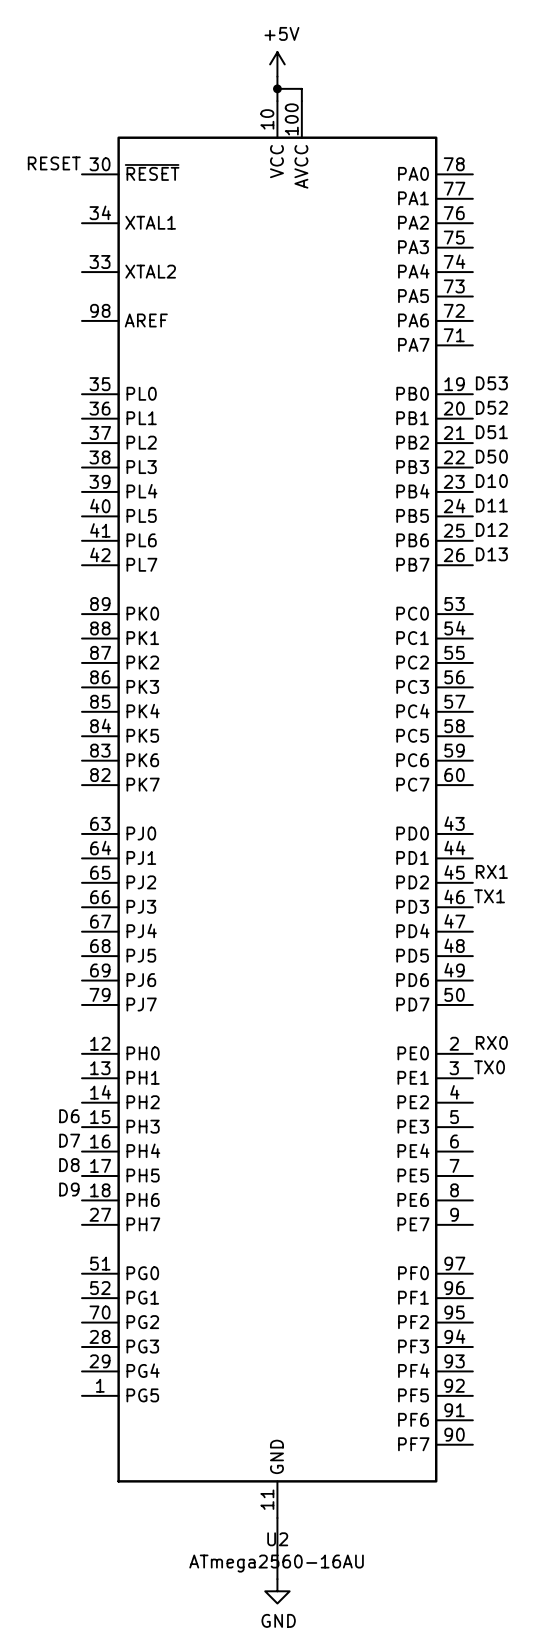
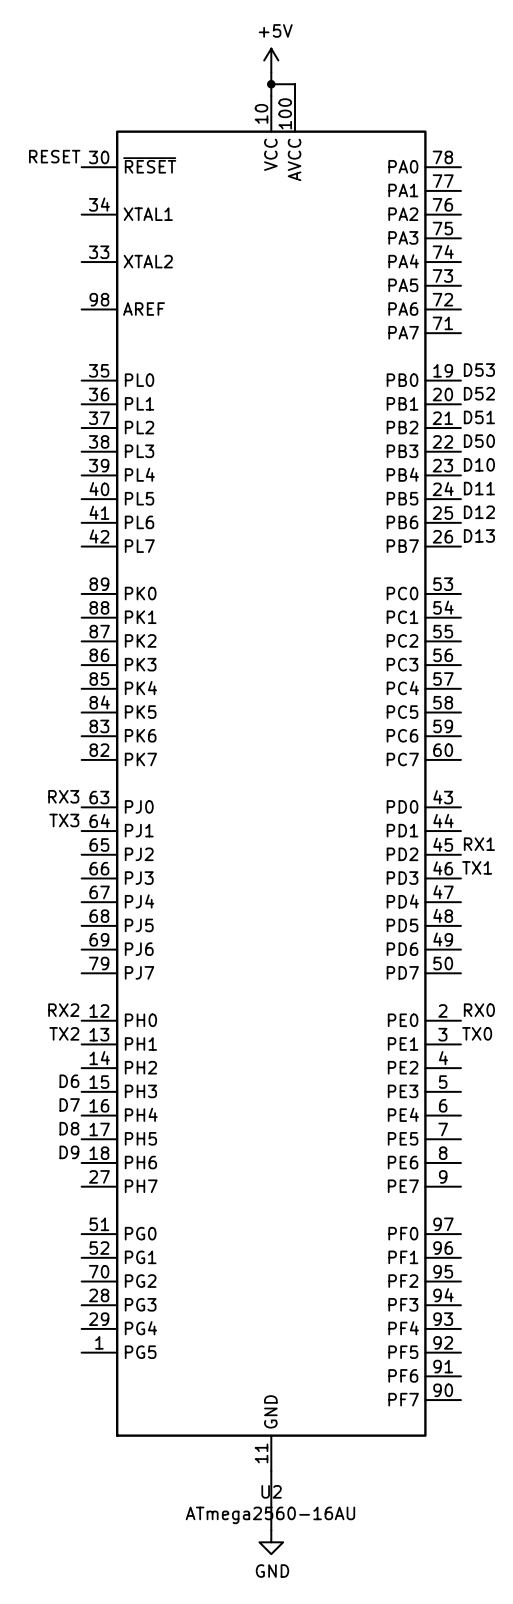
label: none -> RX3 (63, 796)
label: none -> TX3 (64, 820)
label: none -> RX2 (63, 1010)
label: none -> TX2 (64, 1033)

